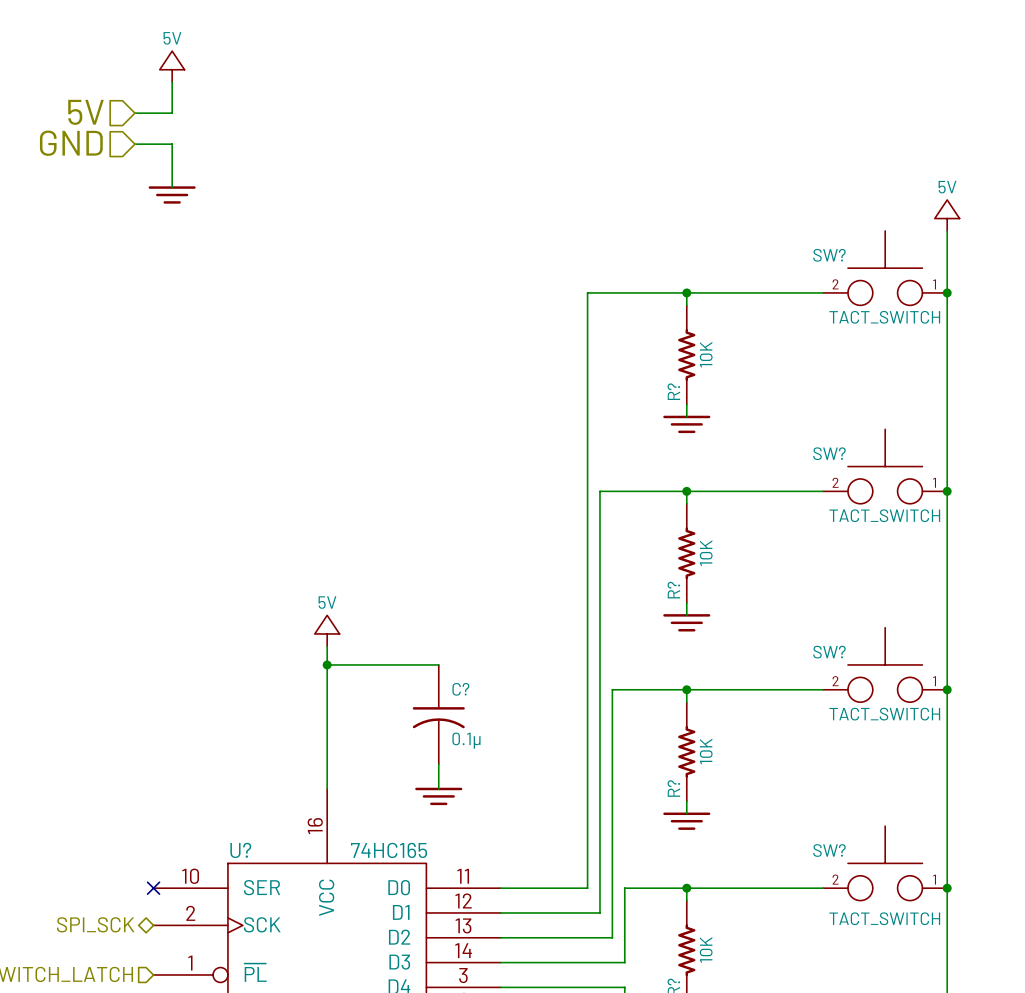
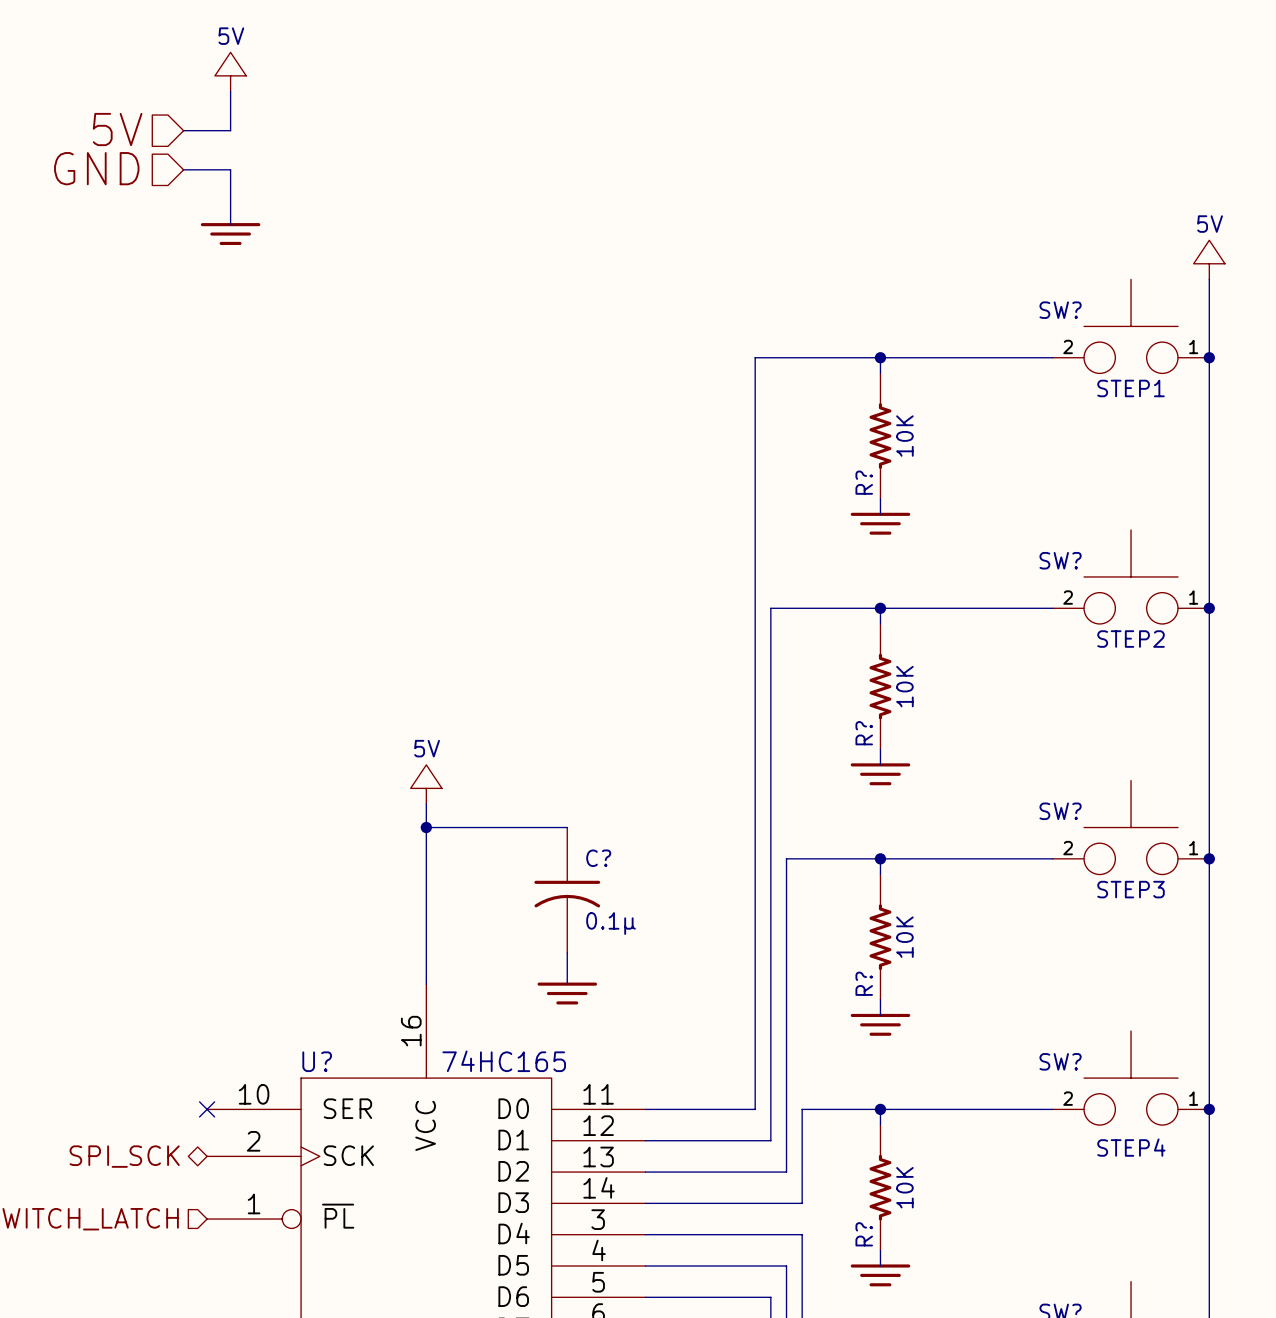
SW? value: TACT_SWITCH (884, 317) -> STEP1 (1131, 388)
SW? value: TACT_SWITCH (884, 515) -> STEP2 (1131, 639)
SW? value: TACT_SWITCH (884, 714) -> STEP3 (1131, 889)
SW? value: TACT_SWITCH (884, 918) -> STEP4 (1131, 1147)

